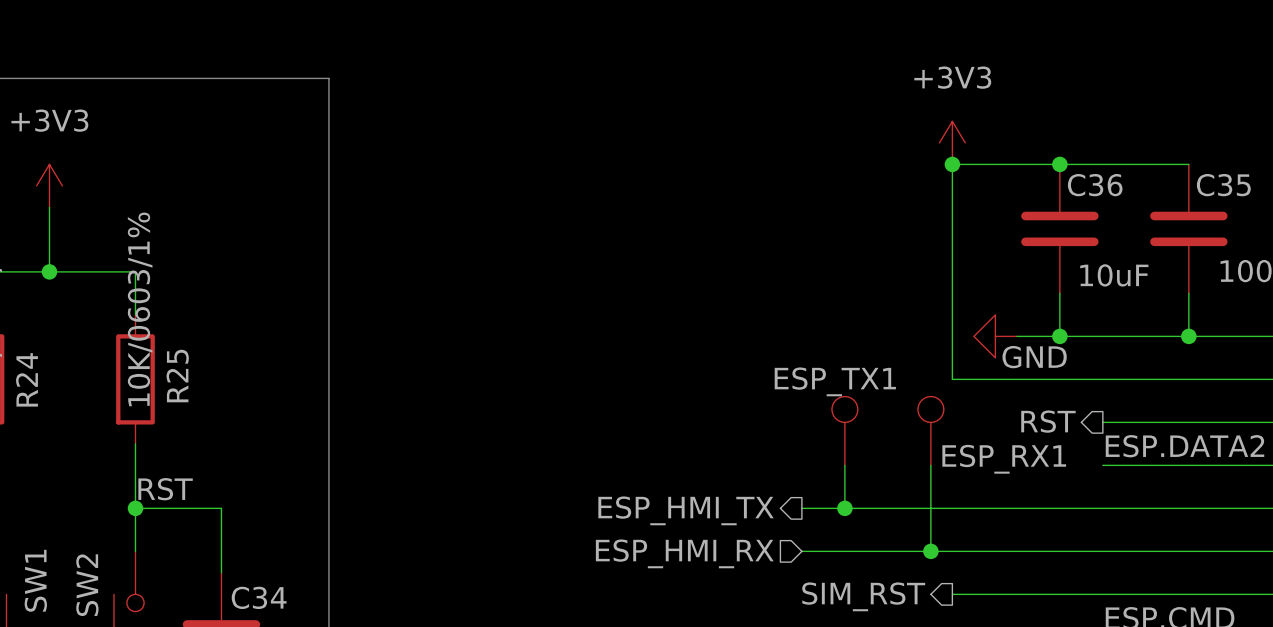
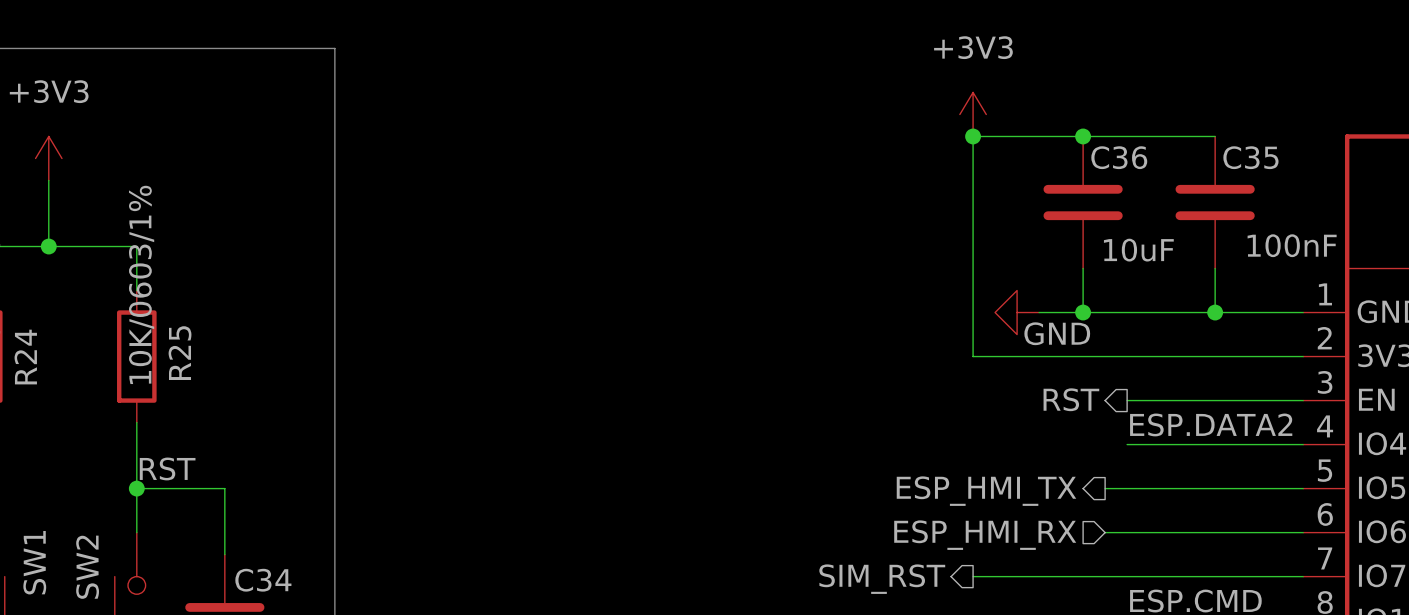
ESP_TX1: (844, 430) -> none
ESP_RX1: (930, 430) -> none
wire: (844, 465) (844, 508) -> none
wire: (930, 465) (930, 551) -> none
wire: (801, 508) (1081, 508) -> none
junction: (844, 508) -> none
hierarchical label position: ESP_HMI_TX (686, 510) -> ESP_HMI_TX (986, 491)
wire: (801, 551) (1081, 551) -> none
junction: (930, 551) -> none
hierarchical label position: ESP_HMI_RX (684, 553) -> ESP_HMI_RX (985, 535)

